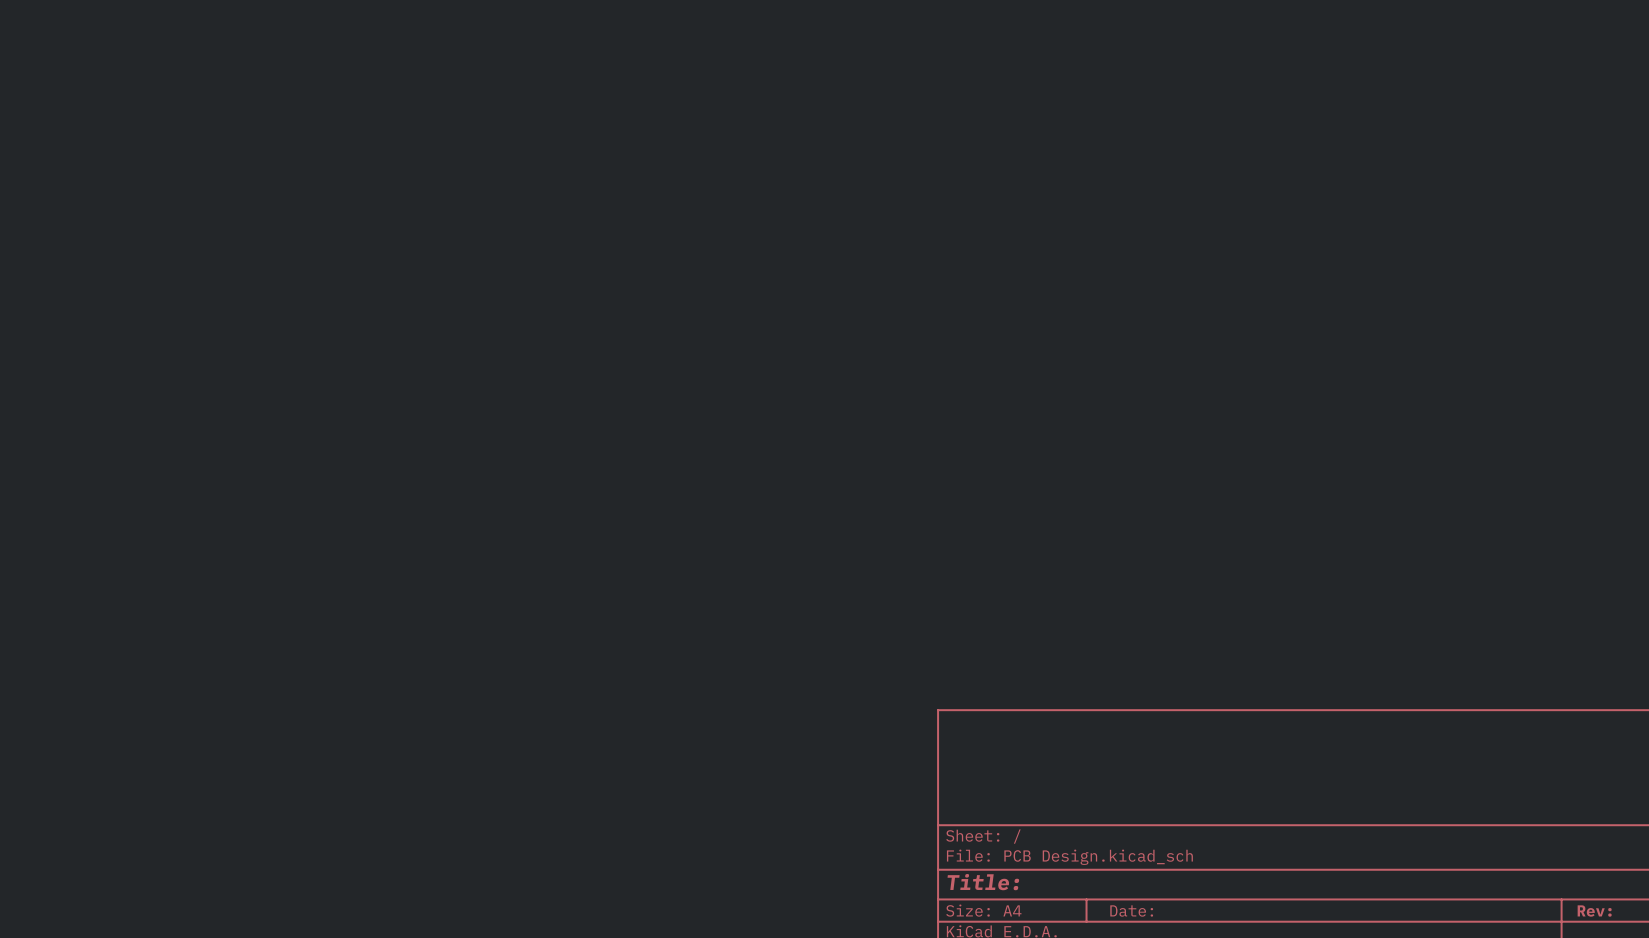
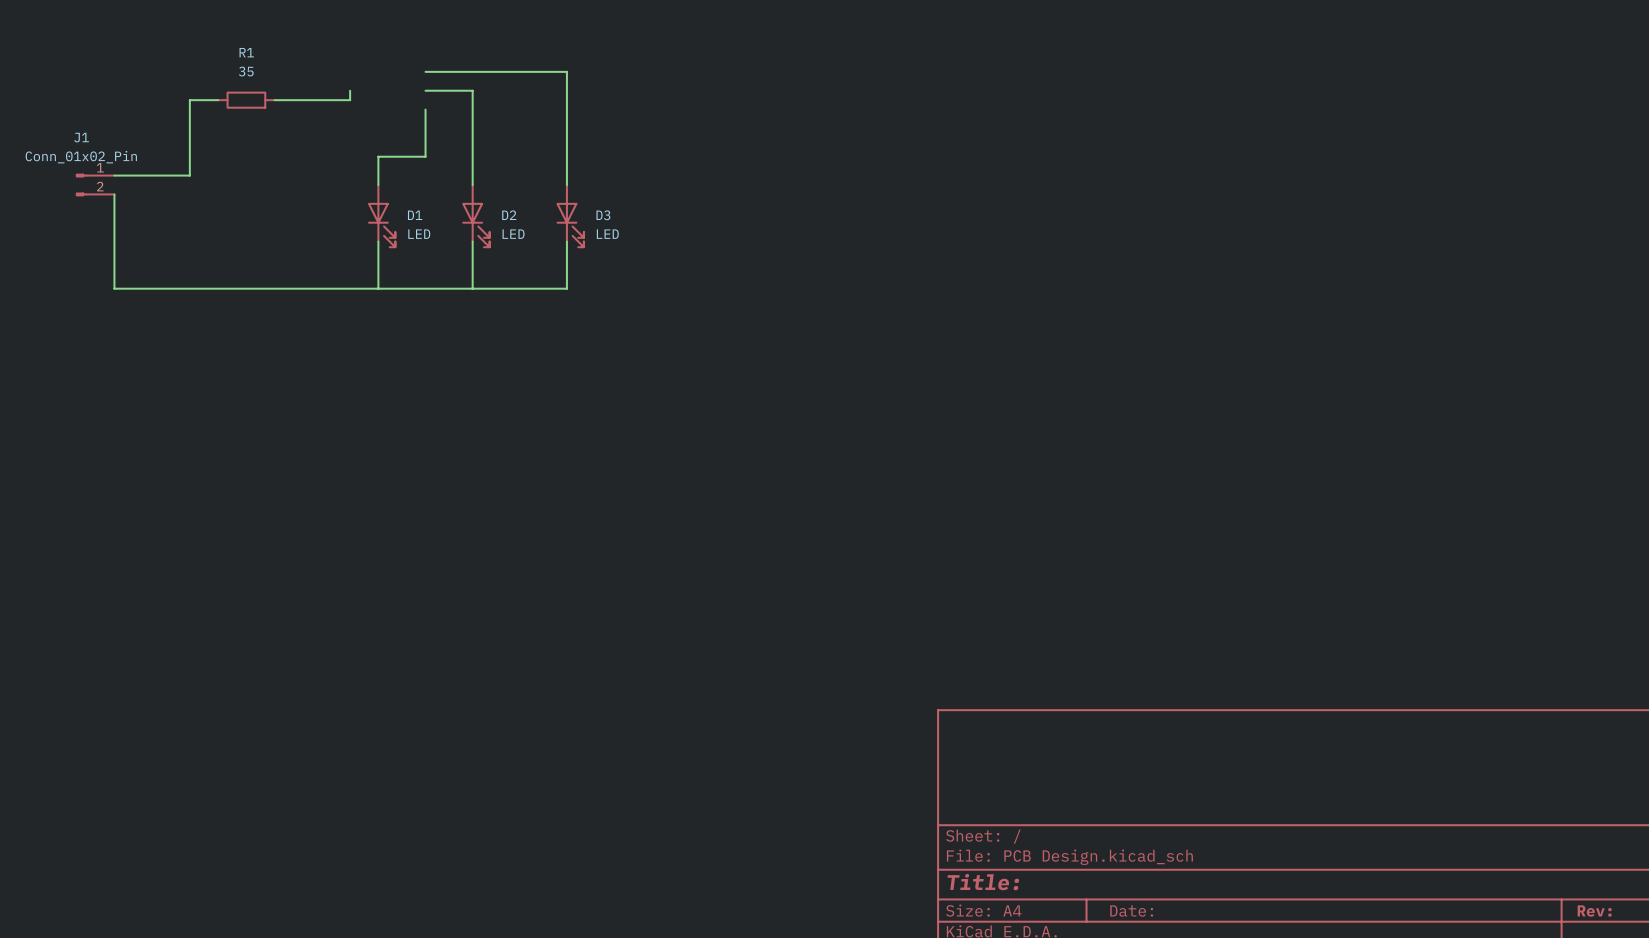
wire: none -> (425, 71) (566, 71) (566, 185)
wire: none -> (350, 90) (350, 100) (274, 100)
wire: none -> (425, 90) (472, 90) (472, 185)
wire: none -> (218, 100) (189, 100) (189, 175) (114, 175)
R1: none -> 35 (246, 100)
wire: none -> (425, 109) (425, 156) (378, 156) (378, 185)
J1: none -> Conn_01x02_Pin (95, 185)
wire: none -> (114, 194) (114, 288) (566, 288) (566, 241)
D1: none -> LED (381, 216)
D2: none -> LED (475, 216)
D3: none -> LED (570, 216)
wire: none -> (378, 241) (378, 288)
wire: none -> (472, 241) (472, 288)

